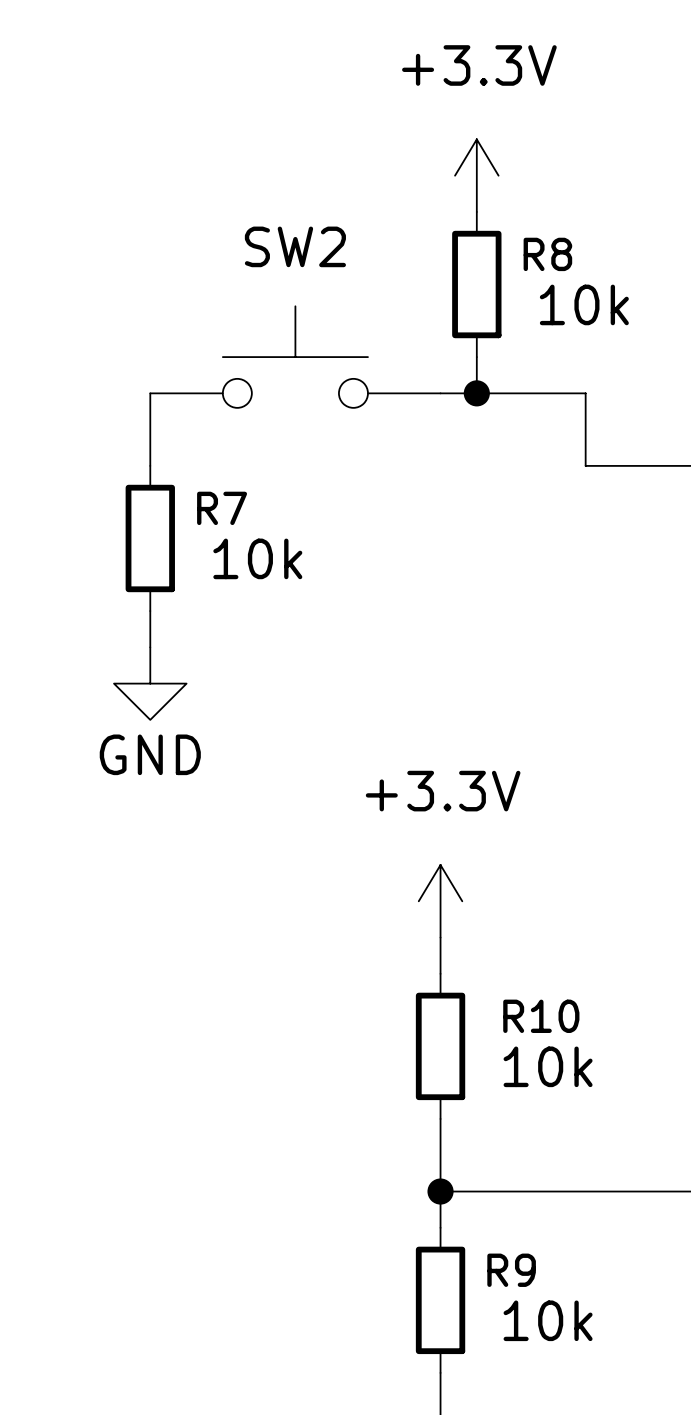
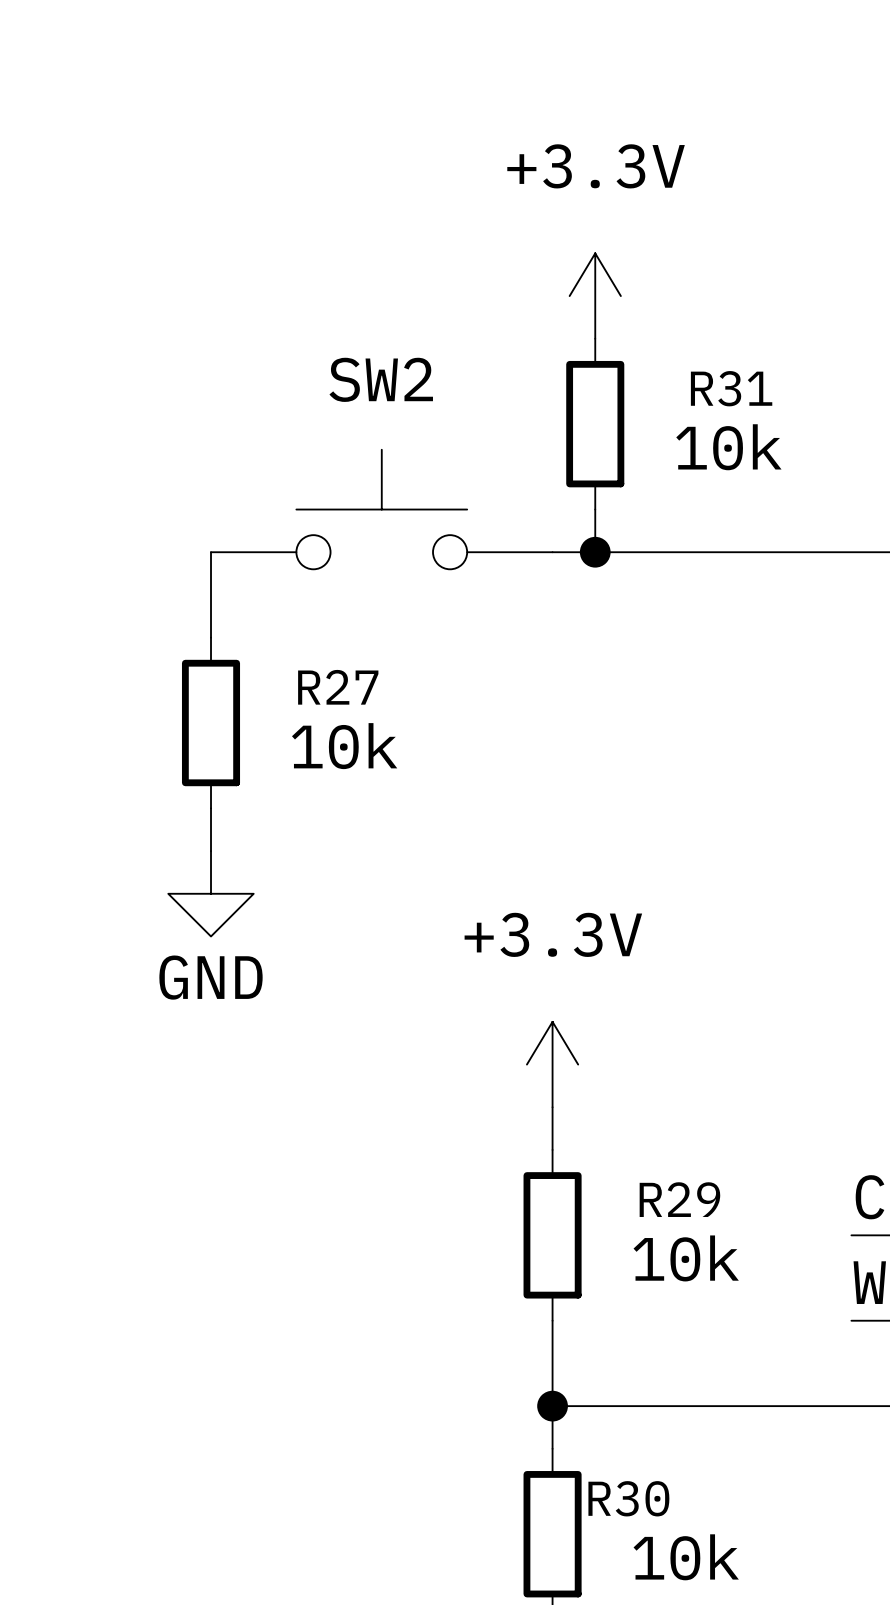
power symbol position: +3.3V (476, 175) -> +3.3V (595, 296)
R8: 10k (476, 284) -> none
SW2 position: (295, 357) -> (381, 509)
wire: (476, 357) (476, 393) -> (595, 509) (595, 552)
R31: none -> 10k (595, 424)
wire: (150, 393) (150, 465) -> (211, 637) (211, 552)
wire: (440, 393) (585, 393) (585, 465) -> (552, 552) (723, 552)
junction position: (476, 393) -> (595, 552)
R7: 10k (150, 538) -> none
wire: (150, 611) (150, 647) -> (211, 808) (211, 851)
R27: none -> 10k (211, 723)
power symbol position: GND (150, 683) -> GND (211, 893)
R10 name: R10 (541, 1016) -> R29 (679, 1199)
R9 name: R9 (511, 1270) -> R30 (628, 1498)

